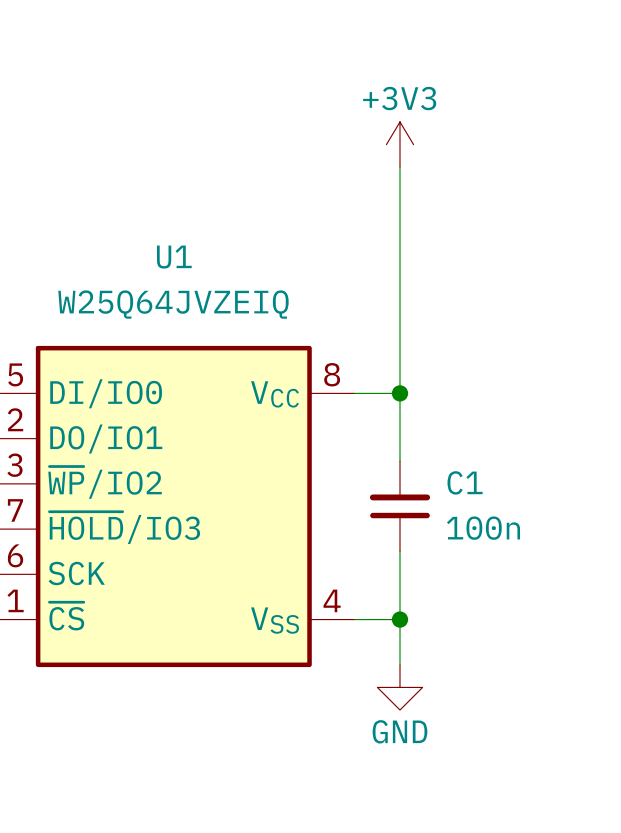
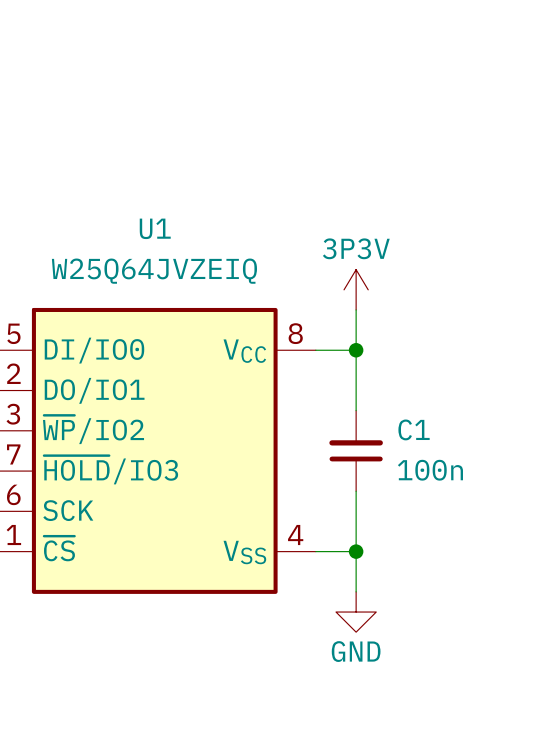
power symbol: +3V3 (400, 144) -> none
wire: (400, 167) (400, 348) -> none
power symbol: none -> 3P3V (356, 289)

